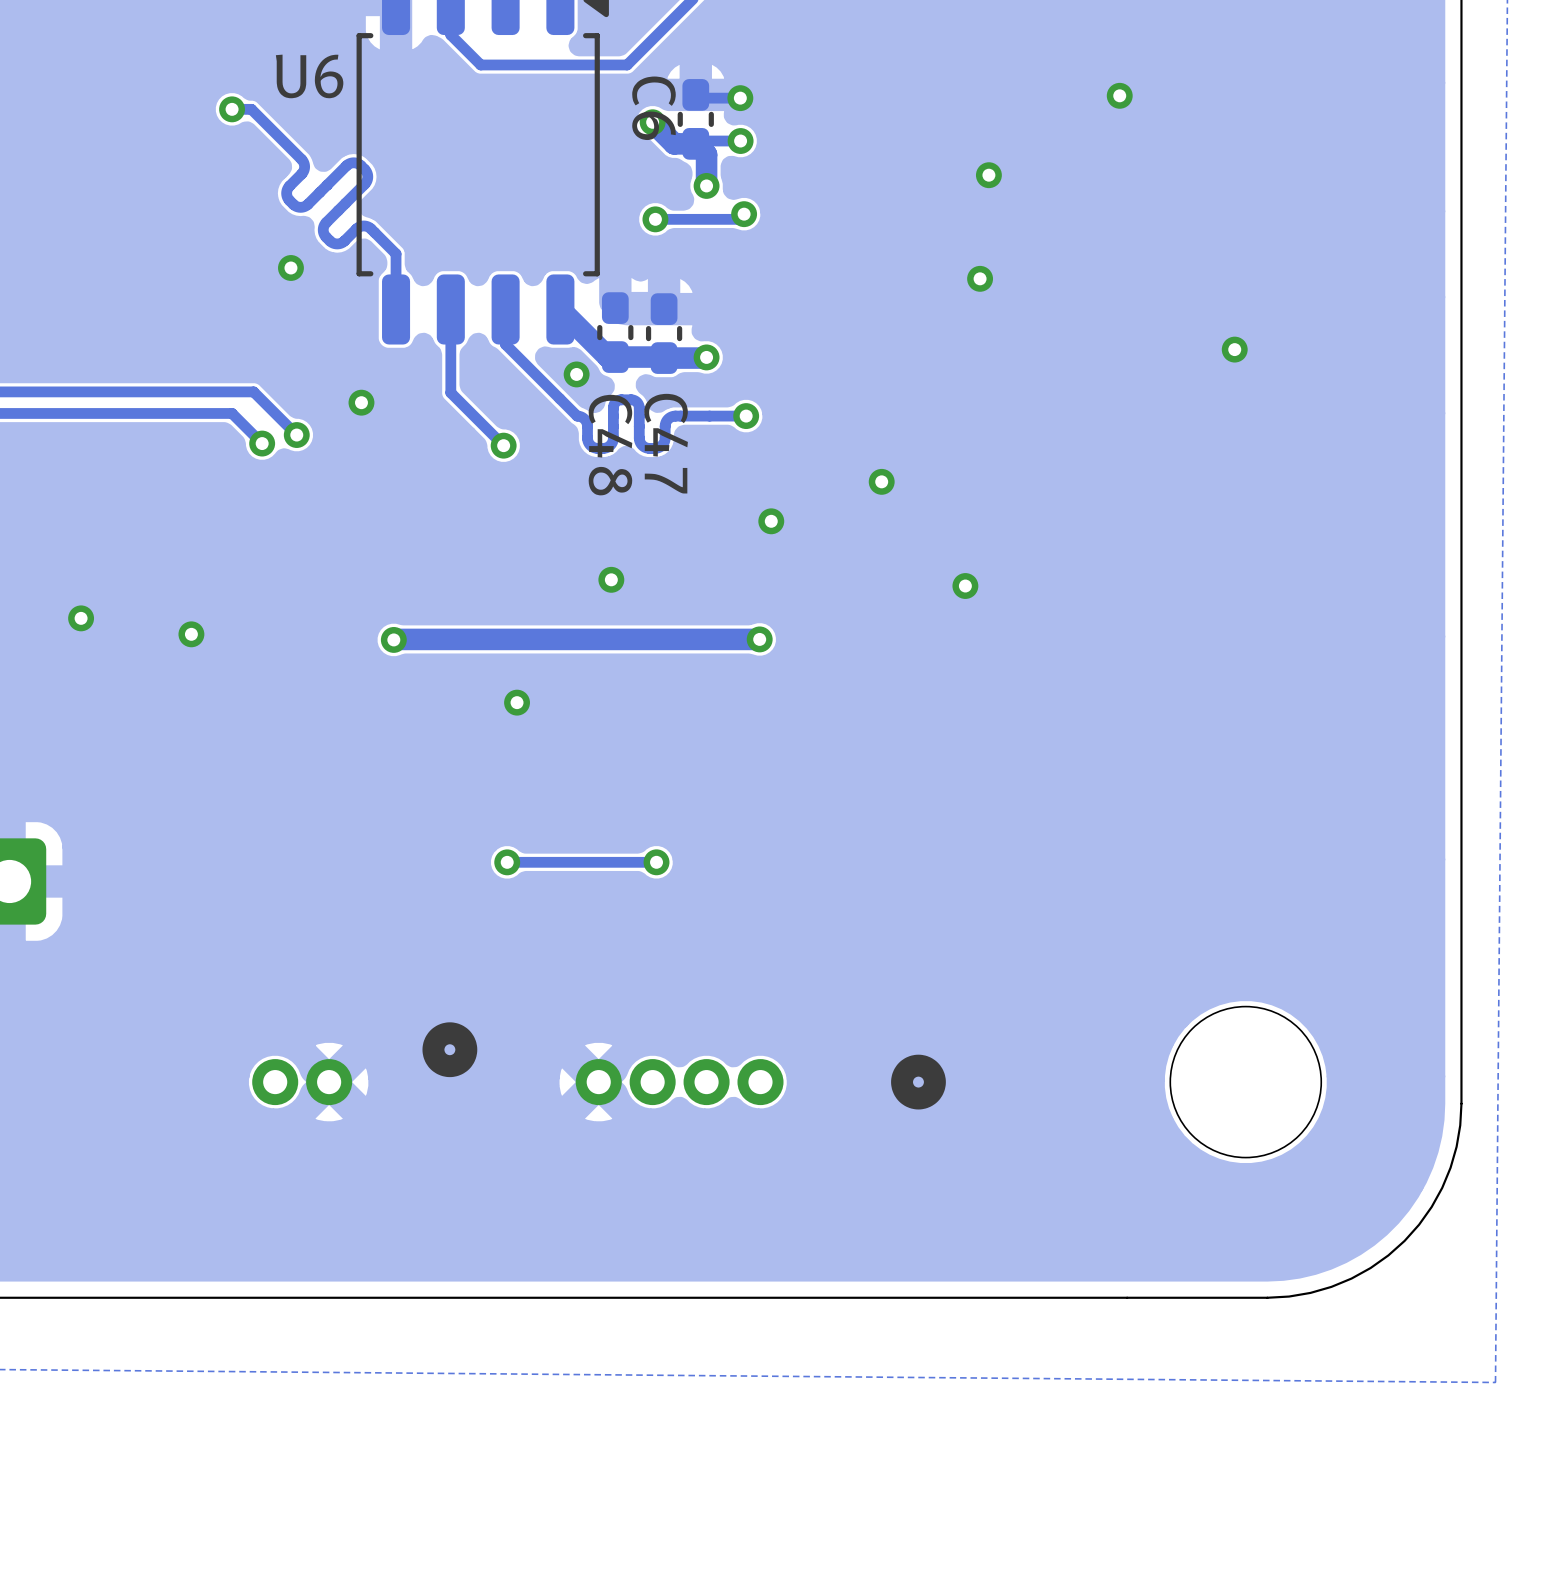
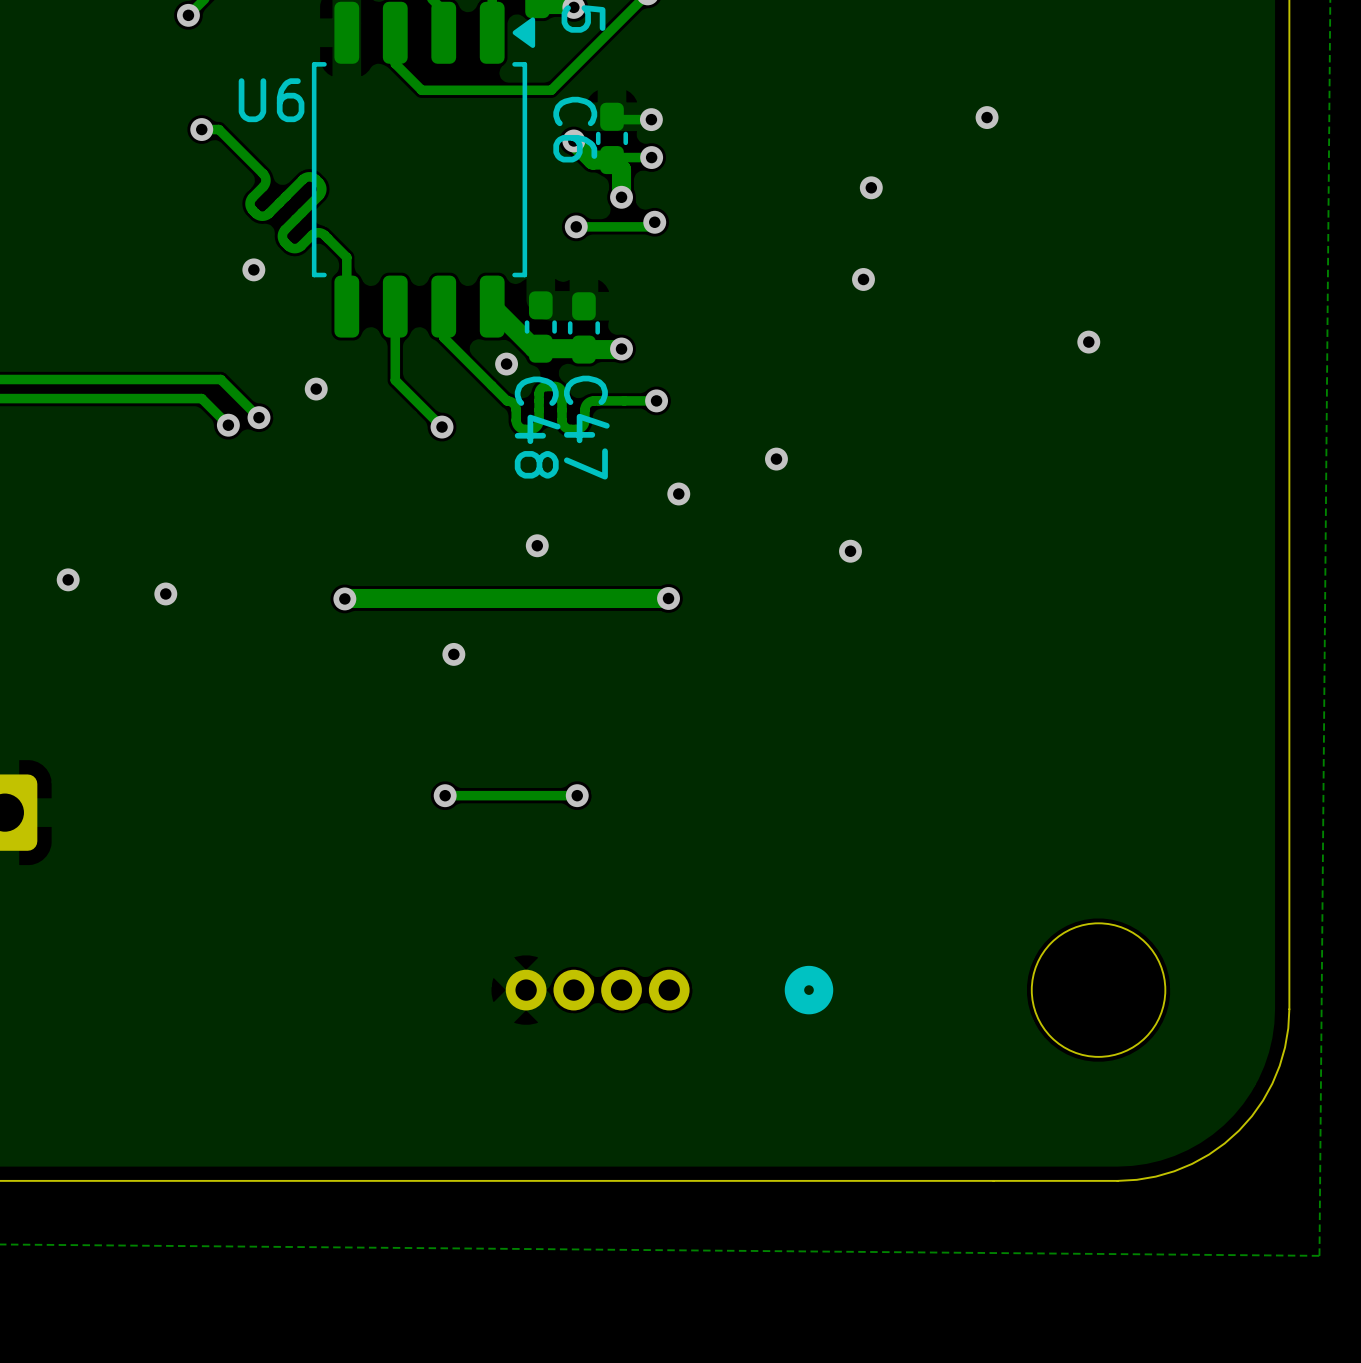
part: (364, 1063) -> none

